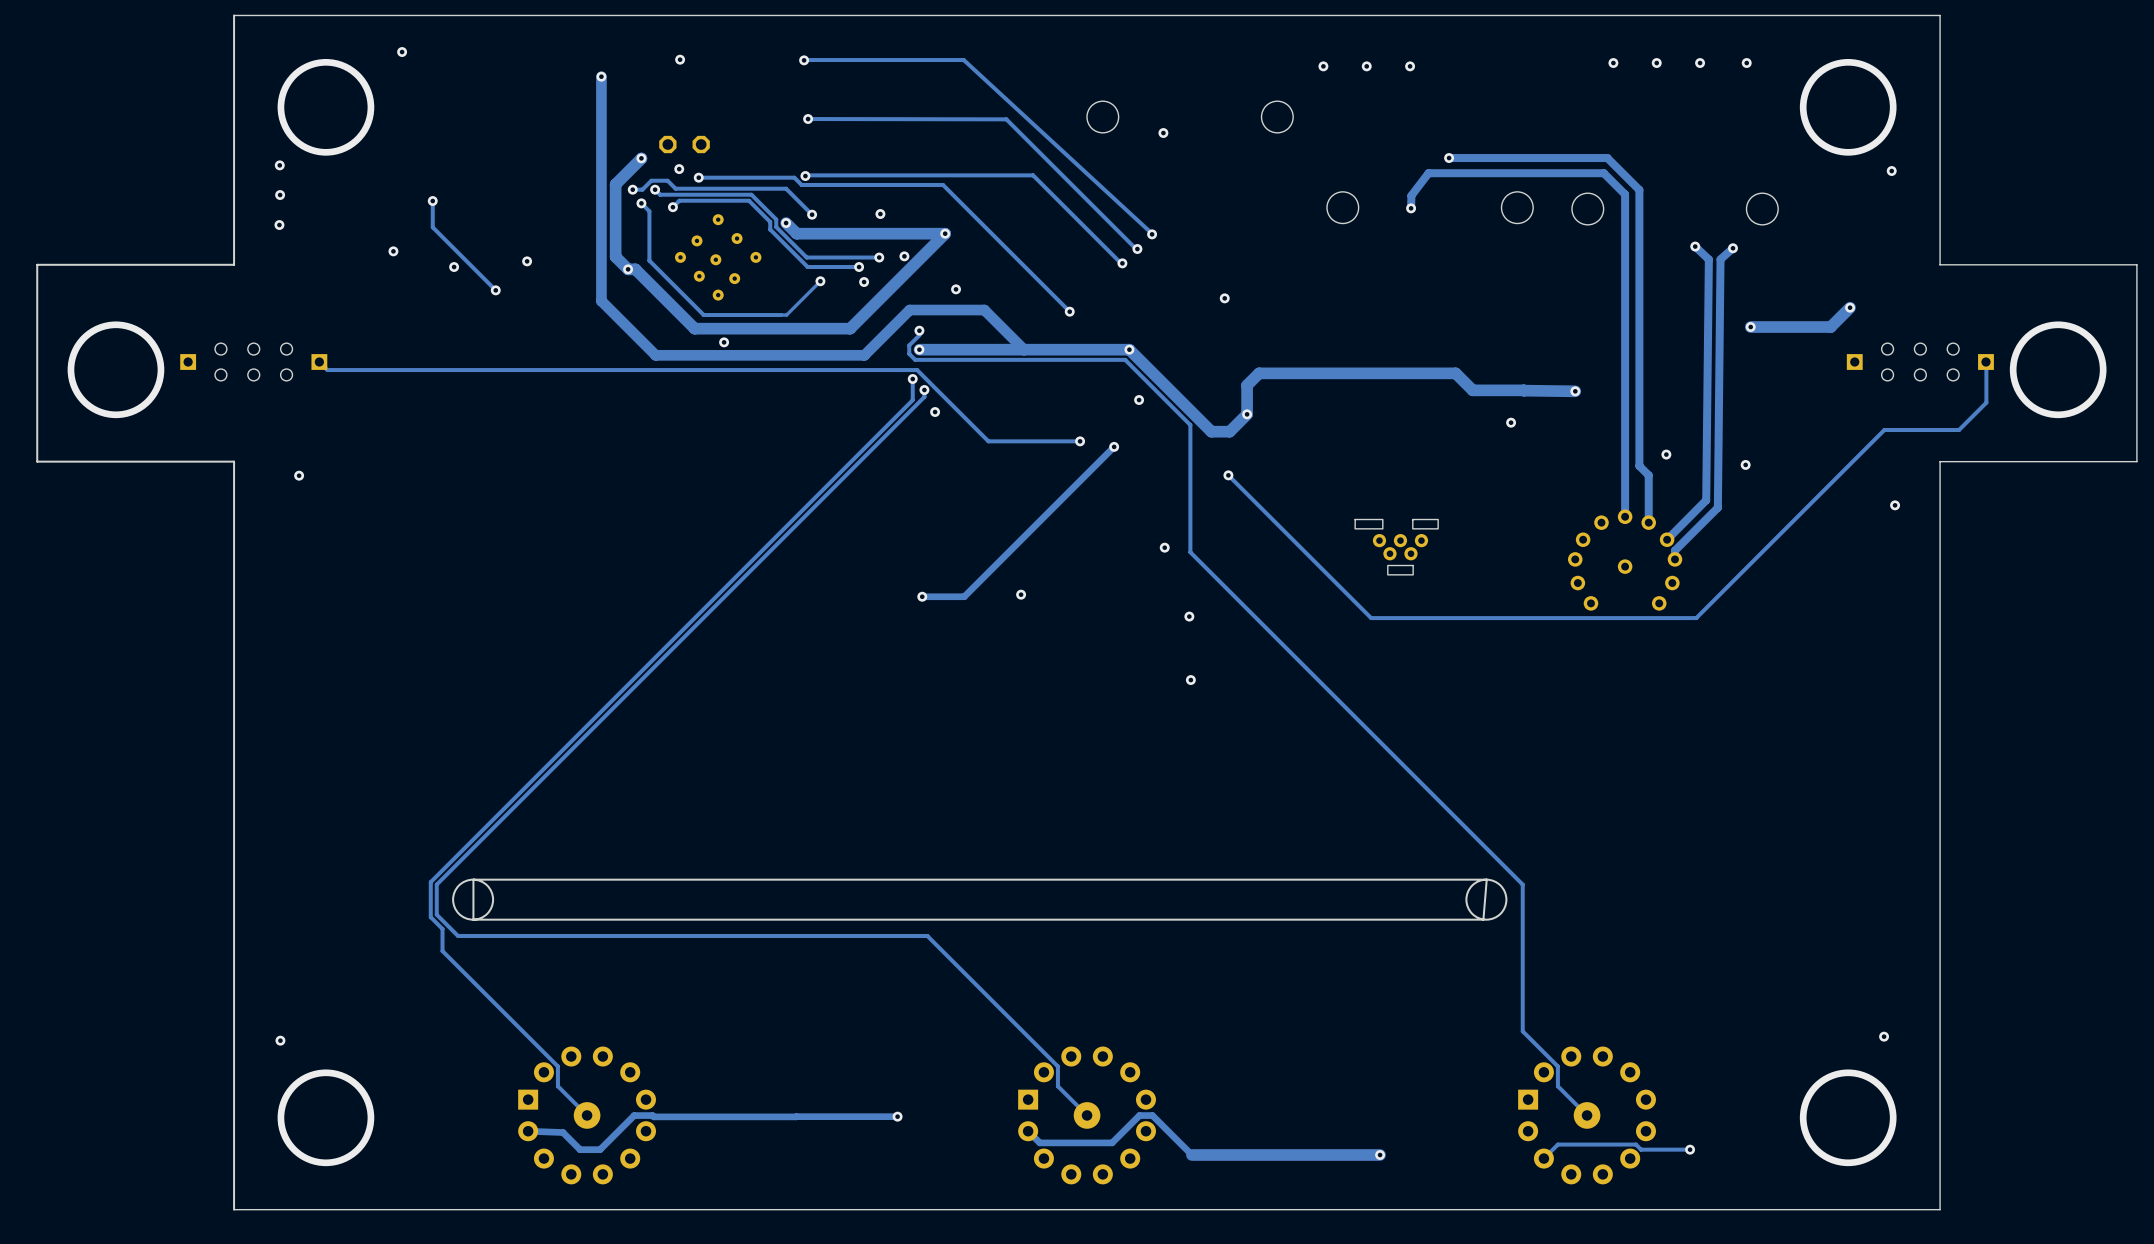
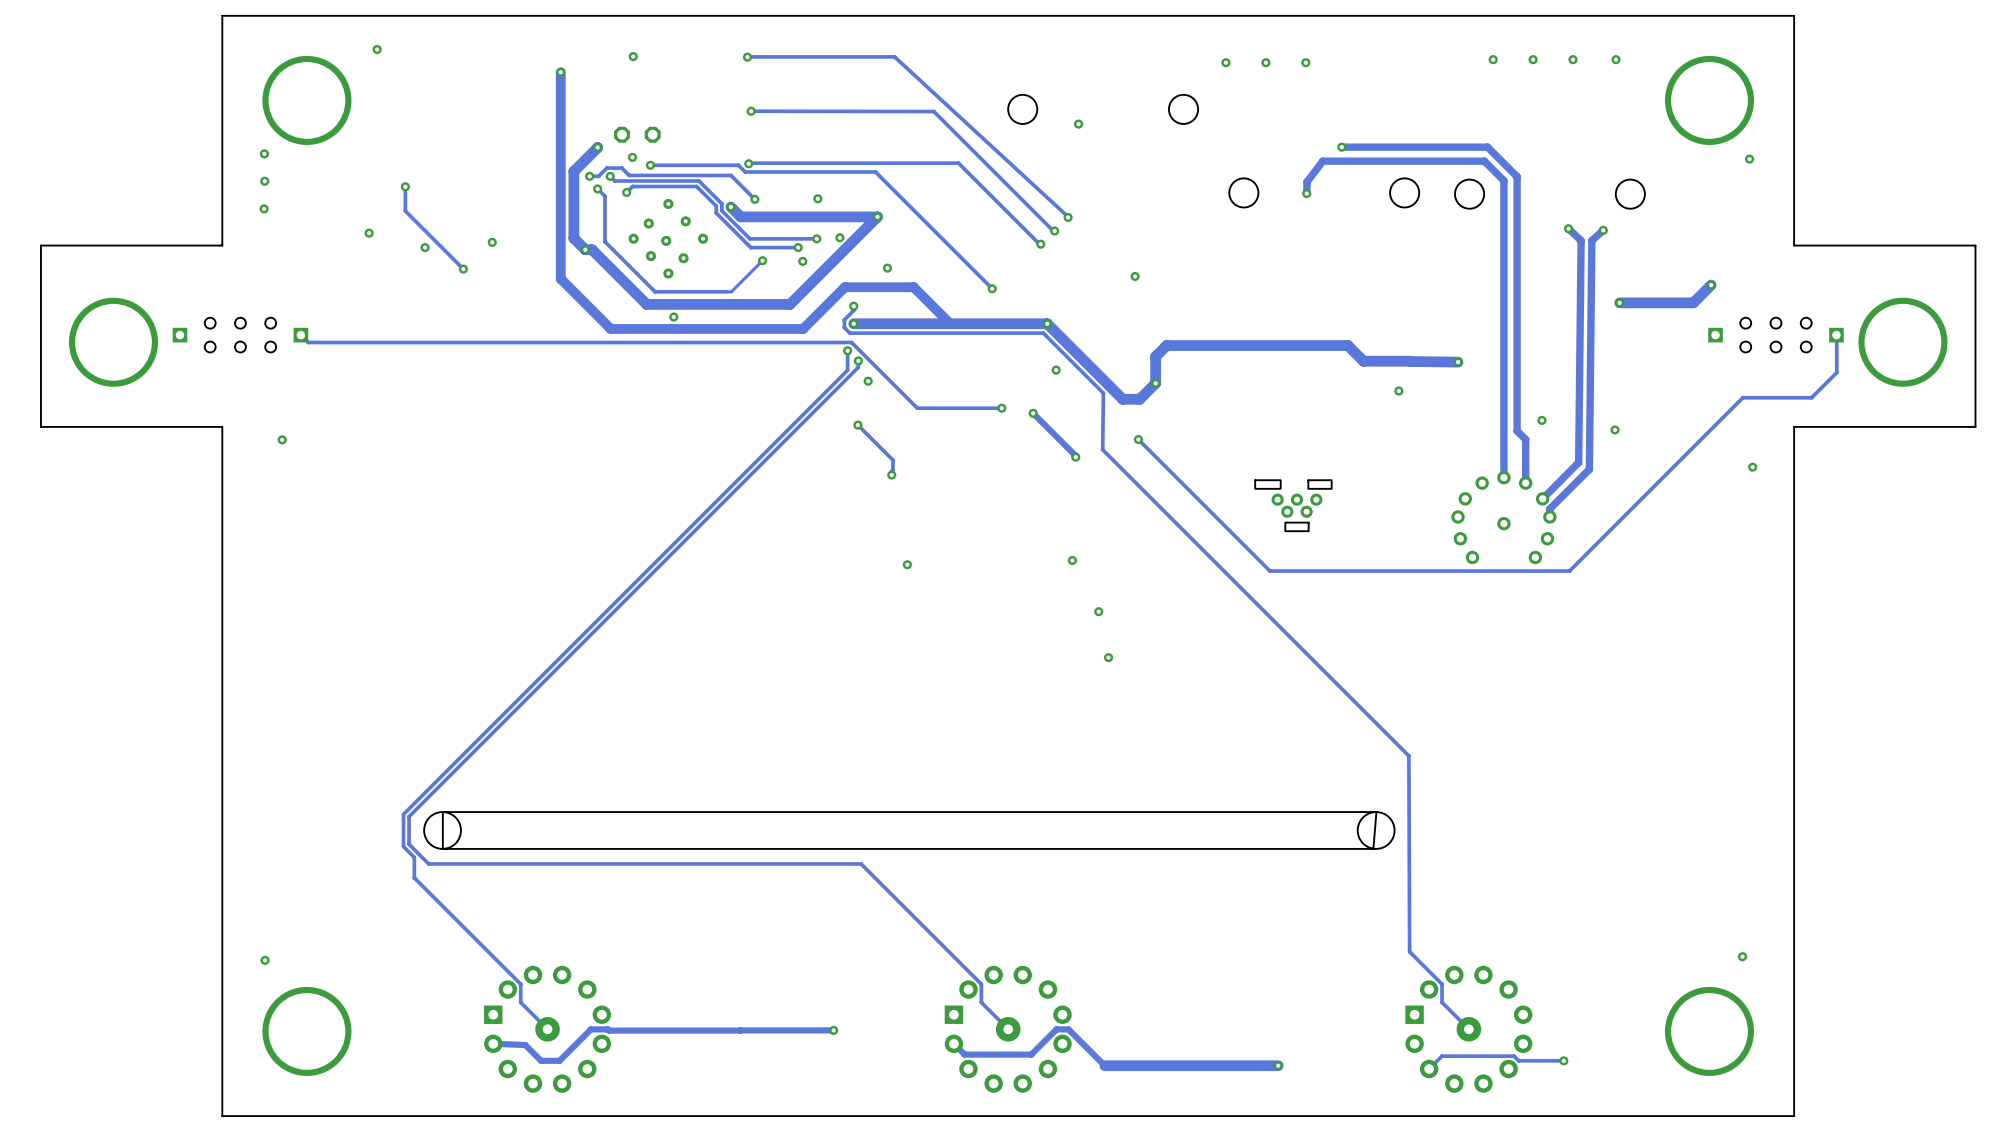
track: (1190, 425) (1190, 552) (1522, 884) (1522, 1031) -> (1103, 393) (1102, 449) (1408, 755) (1409, 951)
track: (1114, 446) (964, 596) (922, 596) -> (1033, 413) (1075, 455)
track: none -> (857, 425) (892, 460) (891, 475)
via: none -> (857, 425)
via: none -> (1075, 457)
via: none -> (891, 475)
via: (1164, 547) -> none
via: (1021, 594) -> none
via: (922, 596) -> none
via: none -> (1072, 560)
via: none -> (907, 564)
via: (1189, 616) -> none
via: none -> (1098, 611)
via: (1190, 680) -> none
via: none -> (1108, 657)

